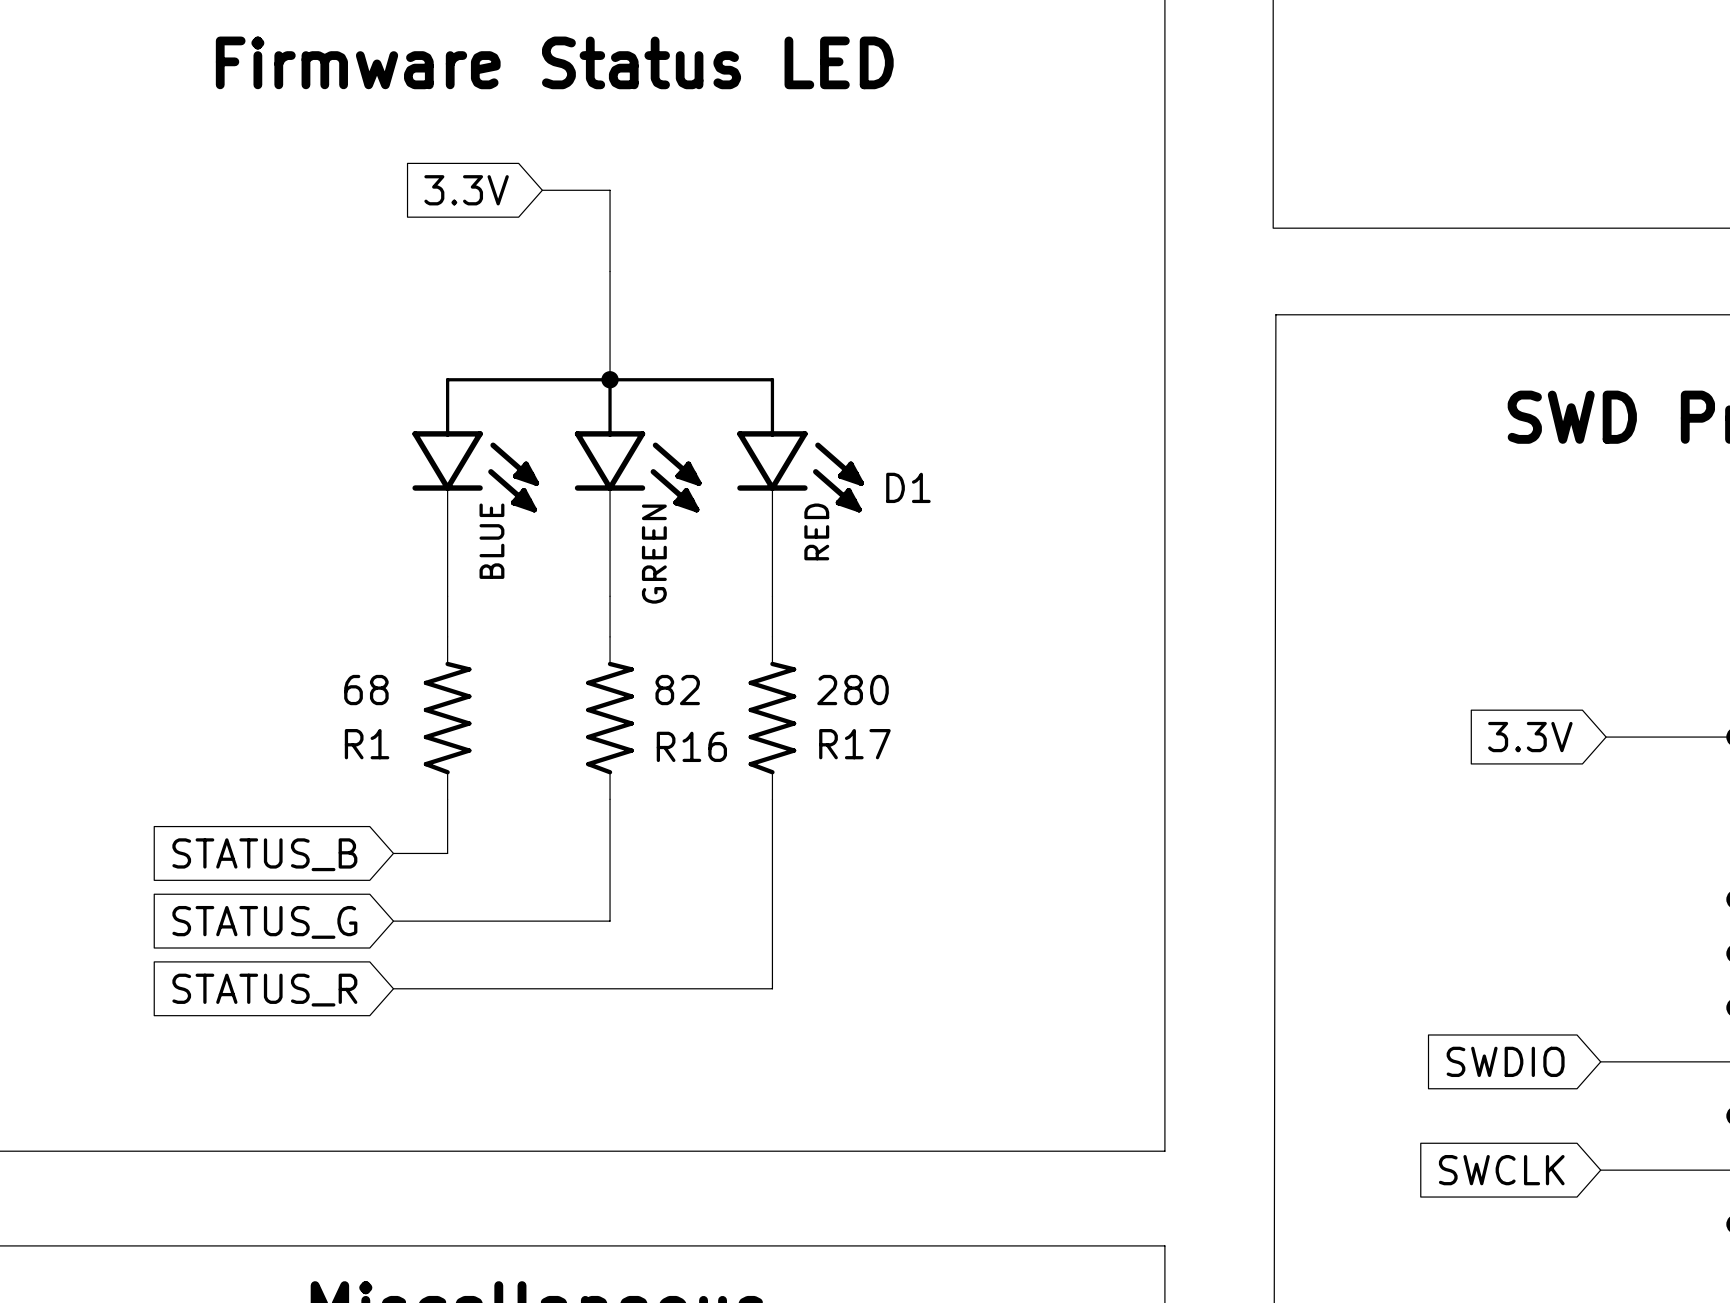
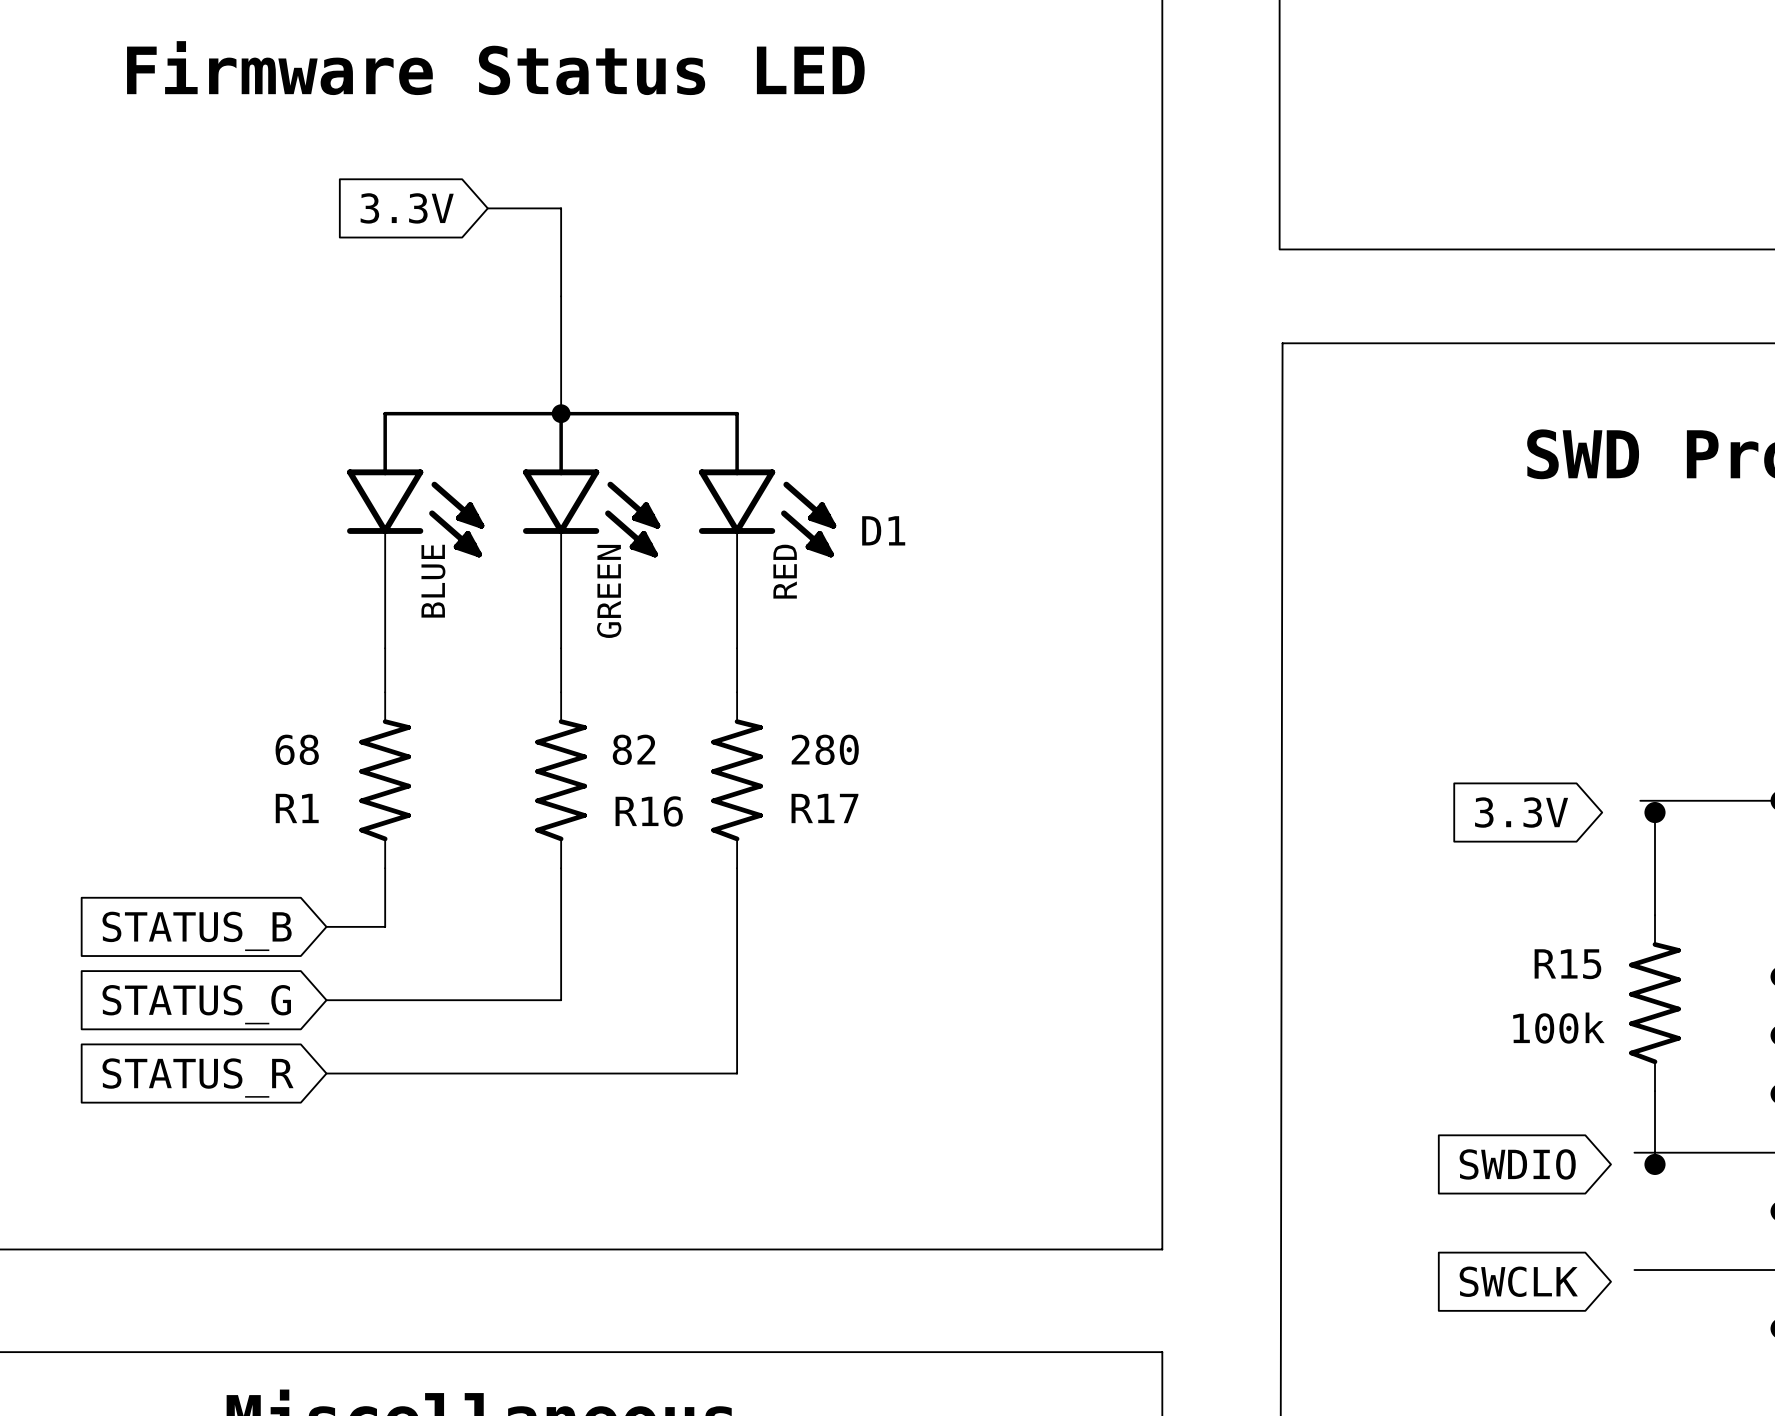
global label position: 3.3V (1530, 737) -> 3.3V (1521, 812)
wire: none -> (1655, 812) (1655, 915)
junction: none -> (1655, 812)
R15: none -> 100k (1655, 1003)
wire: none -> (1655, 1091) (1655, 1164)
global label position: SWDIO (1505, 1061) -> SWDIO (1517, 1164)
junction: none -> (1655, 1164)
global label position: SWCLK (1501, 1170) -> SWCLK (1518, 1281)

